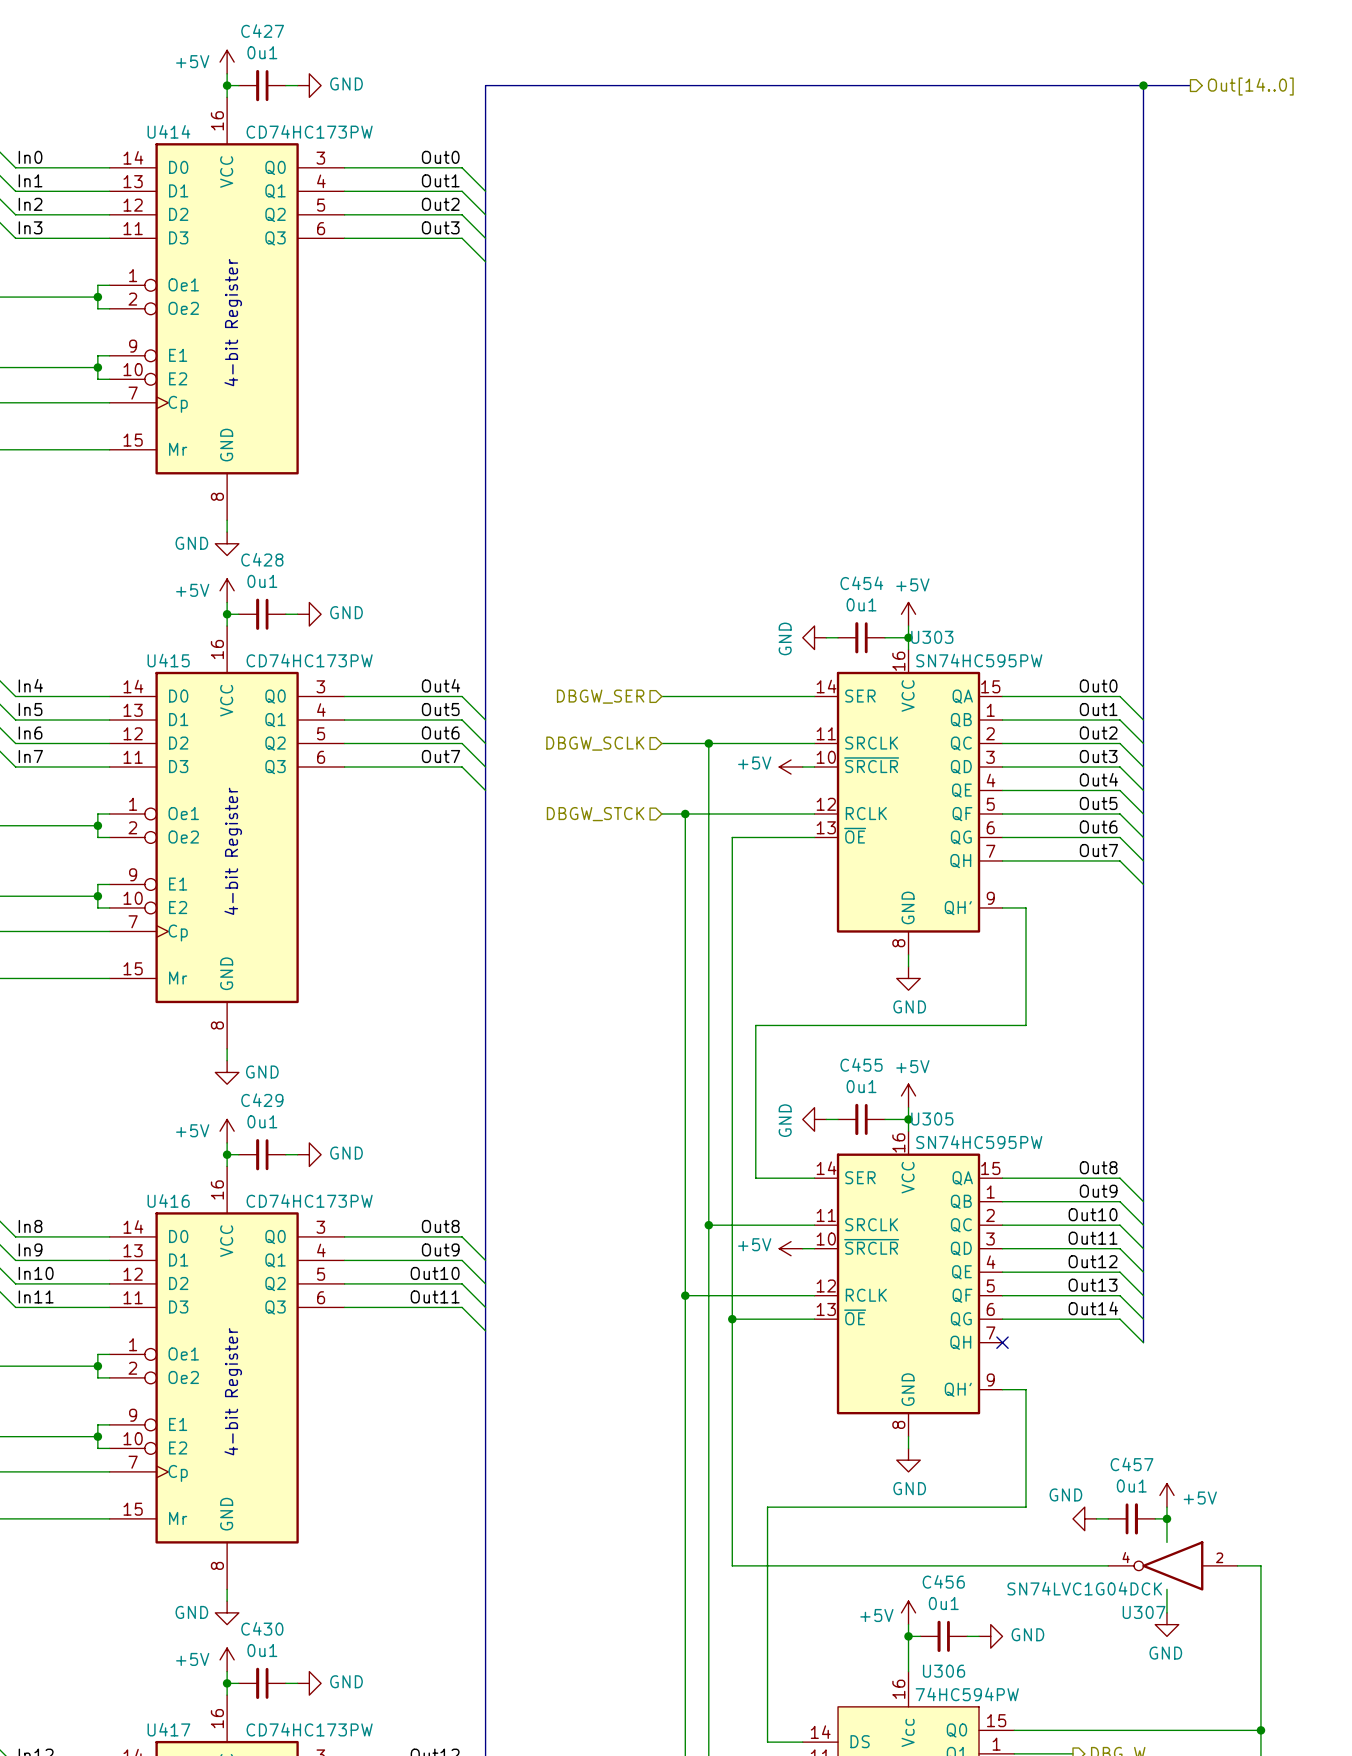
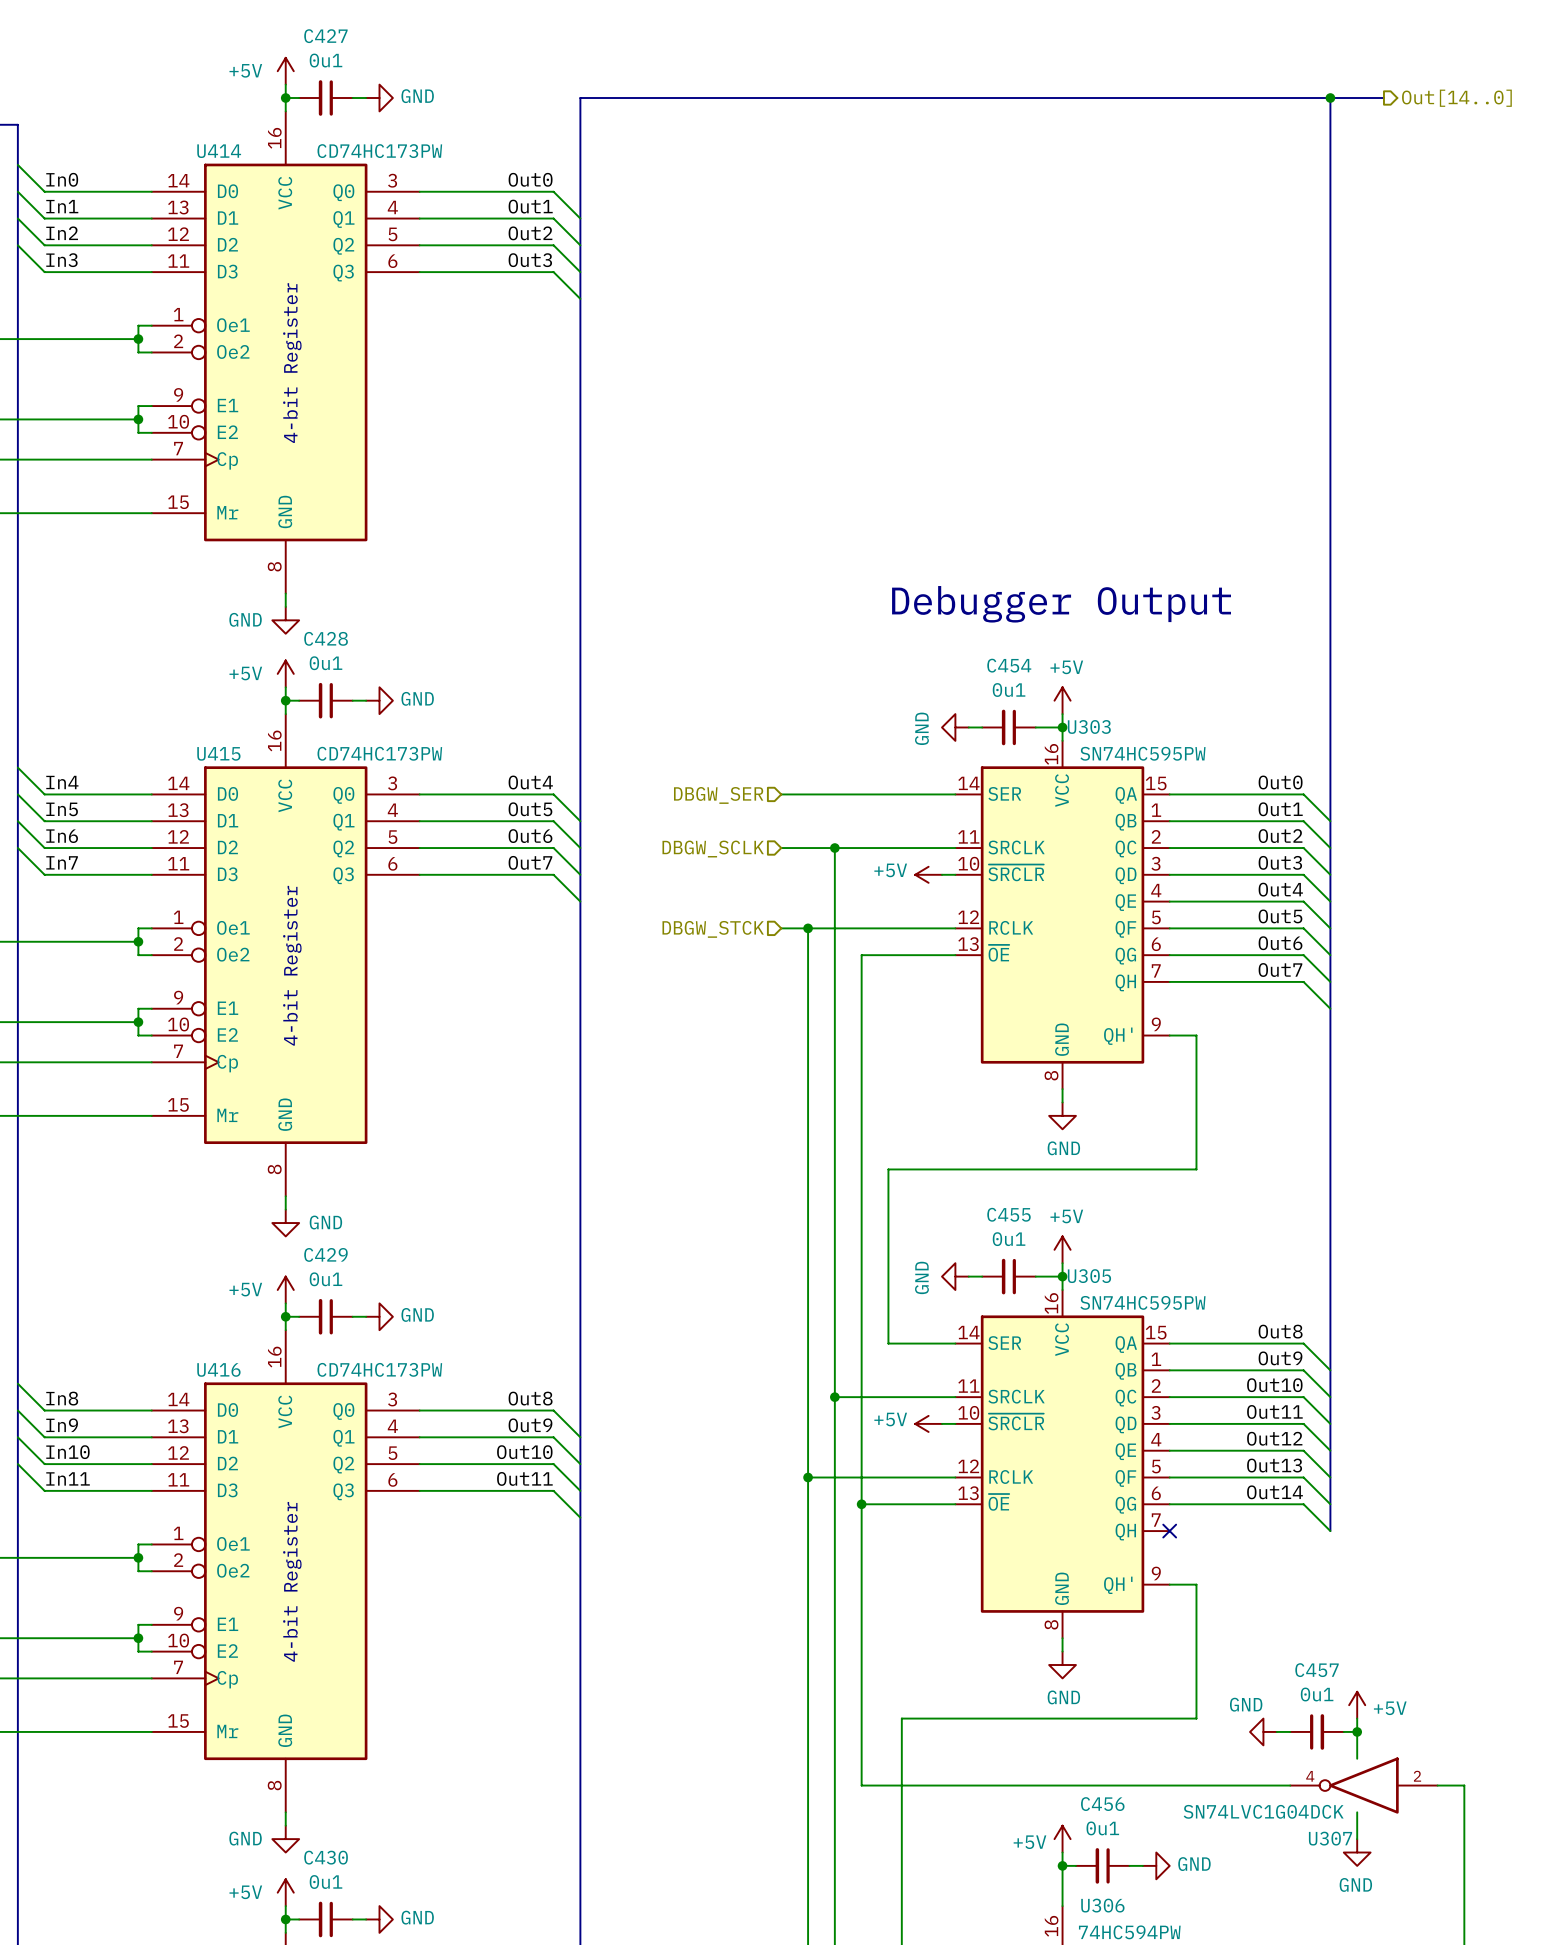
text: none -> Debugger Output (1061, 604)

